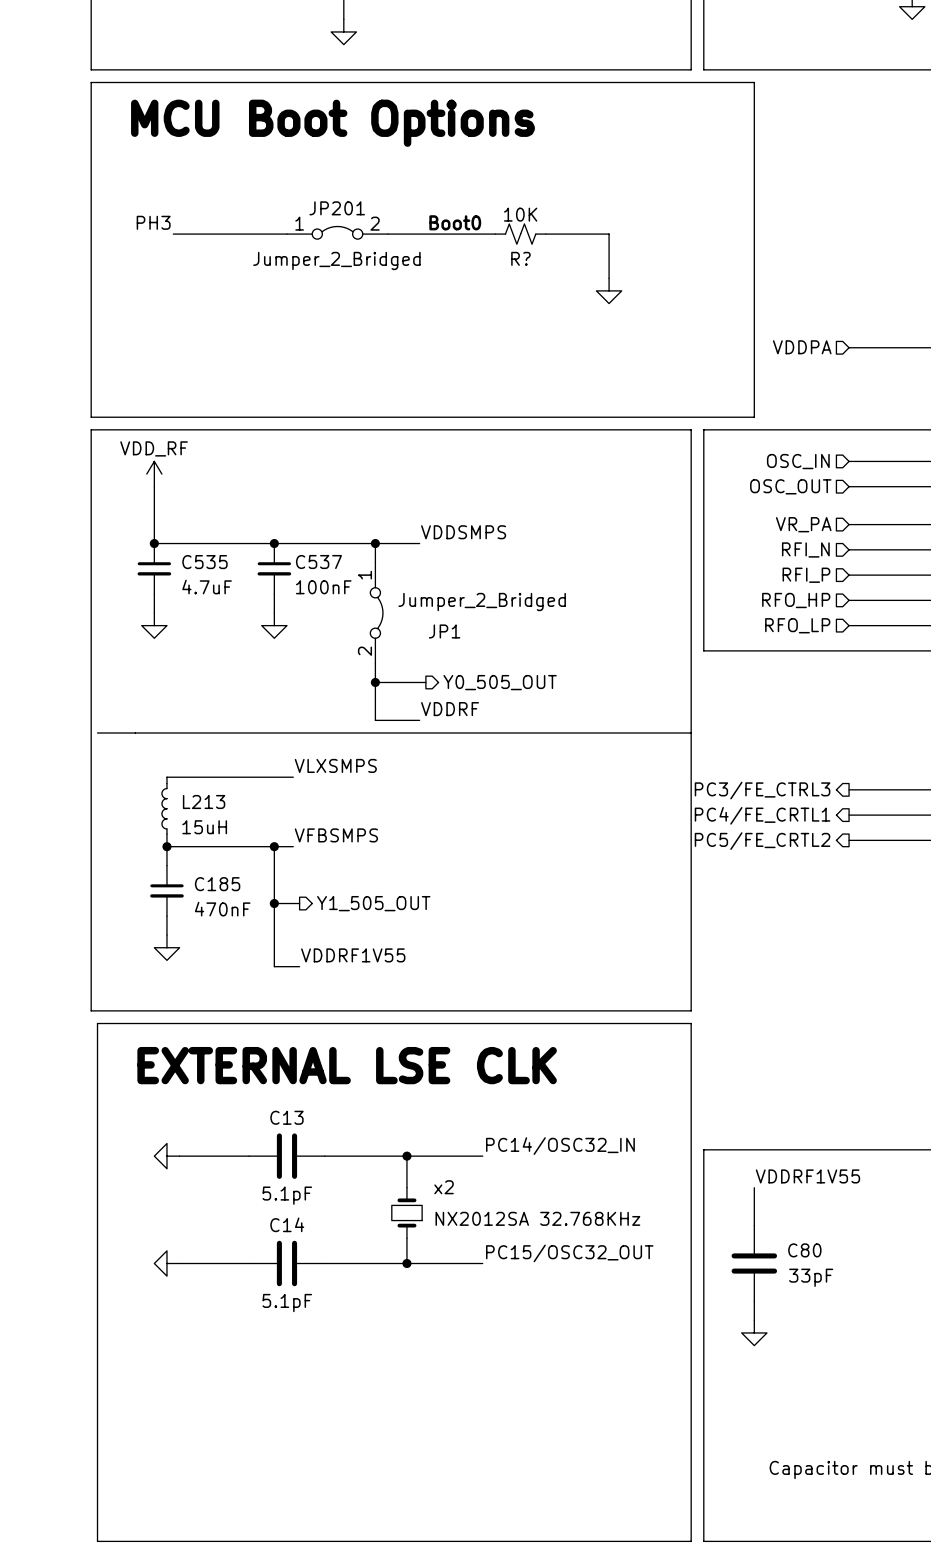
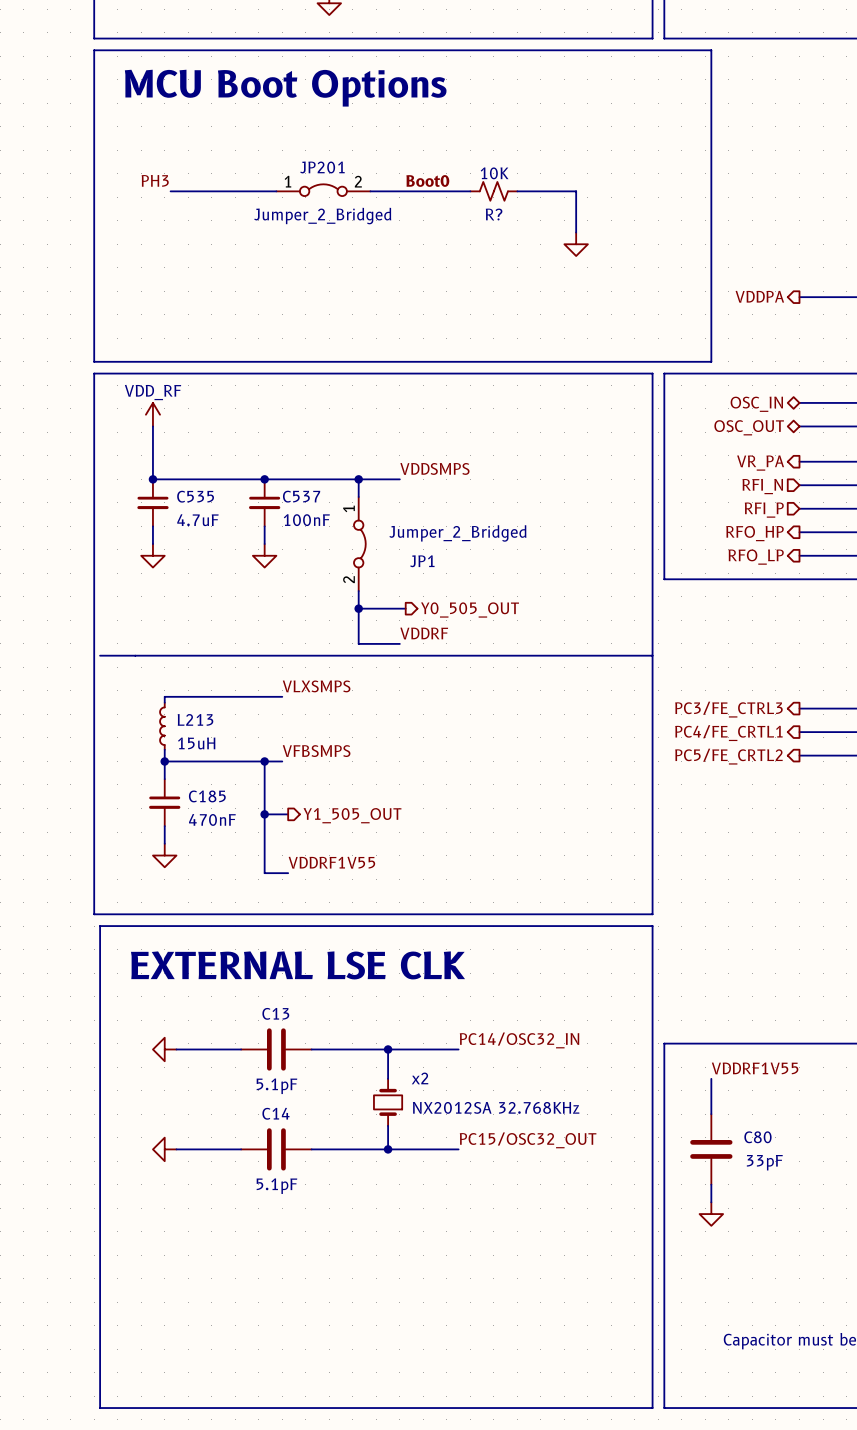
hierarchical label shape: input (802, 347) -> output (759, 296)
hierarchical label shape: input (798, 461) -> bidirectional (756, 404)
hierarchical label shape: input (790, 486) -> bidirectional (749, 427)
hierarchical label shape: input (803, 524) -> output (760, 463)
hierarchical label shape: input (796, 600) -> output (754, 533)
hierarchical label shape: input (797, 625) -> output (756, 557)

